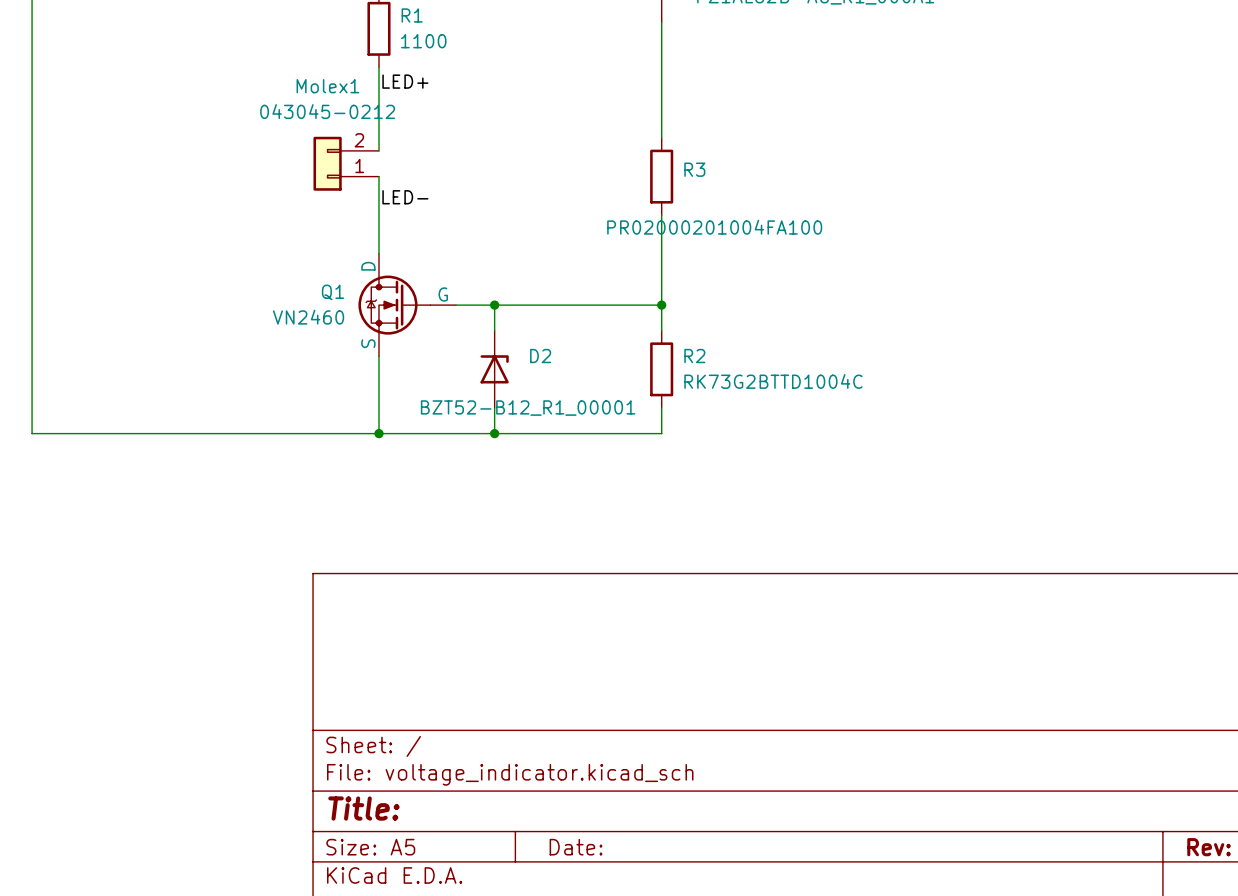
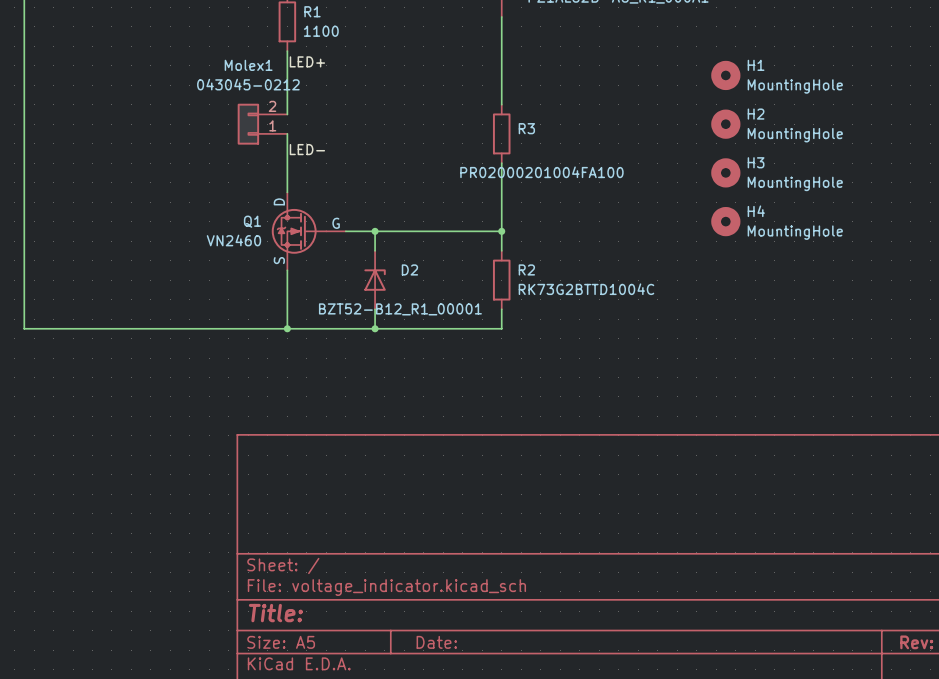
H1: none -> MountingHole (725, 75)
H2: none -> MountingHole (725, 124)
H3: none -> MountingHole (725, 172)
H4: none -> MountingHole (725, 221)

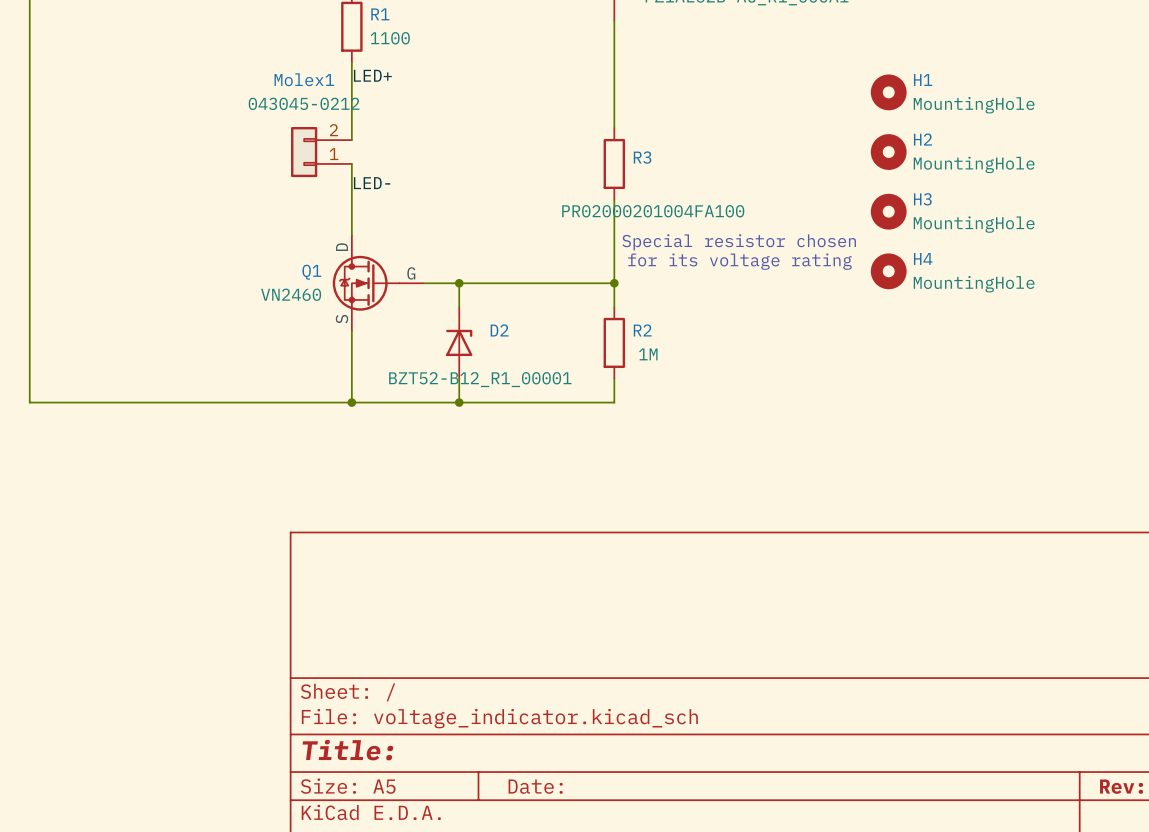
text: none -> Special resistor chosen (739, 242)
text: none -> for its voltage rating (739, 261)
R2 value: RK73G2BTTD1004C (586, 289) -> 1M (648, 354)

